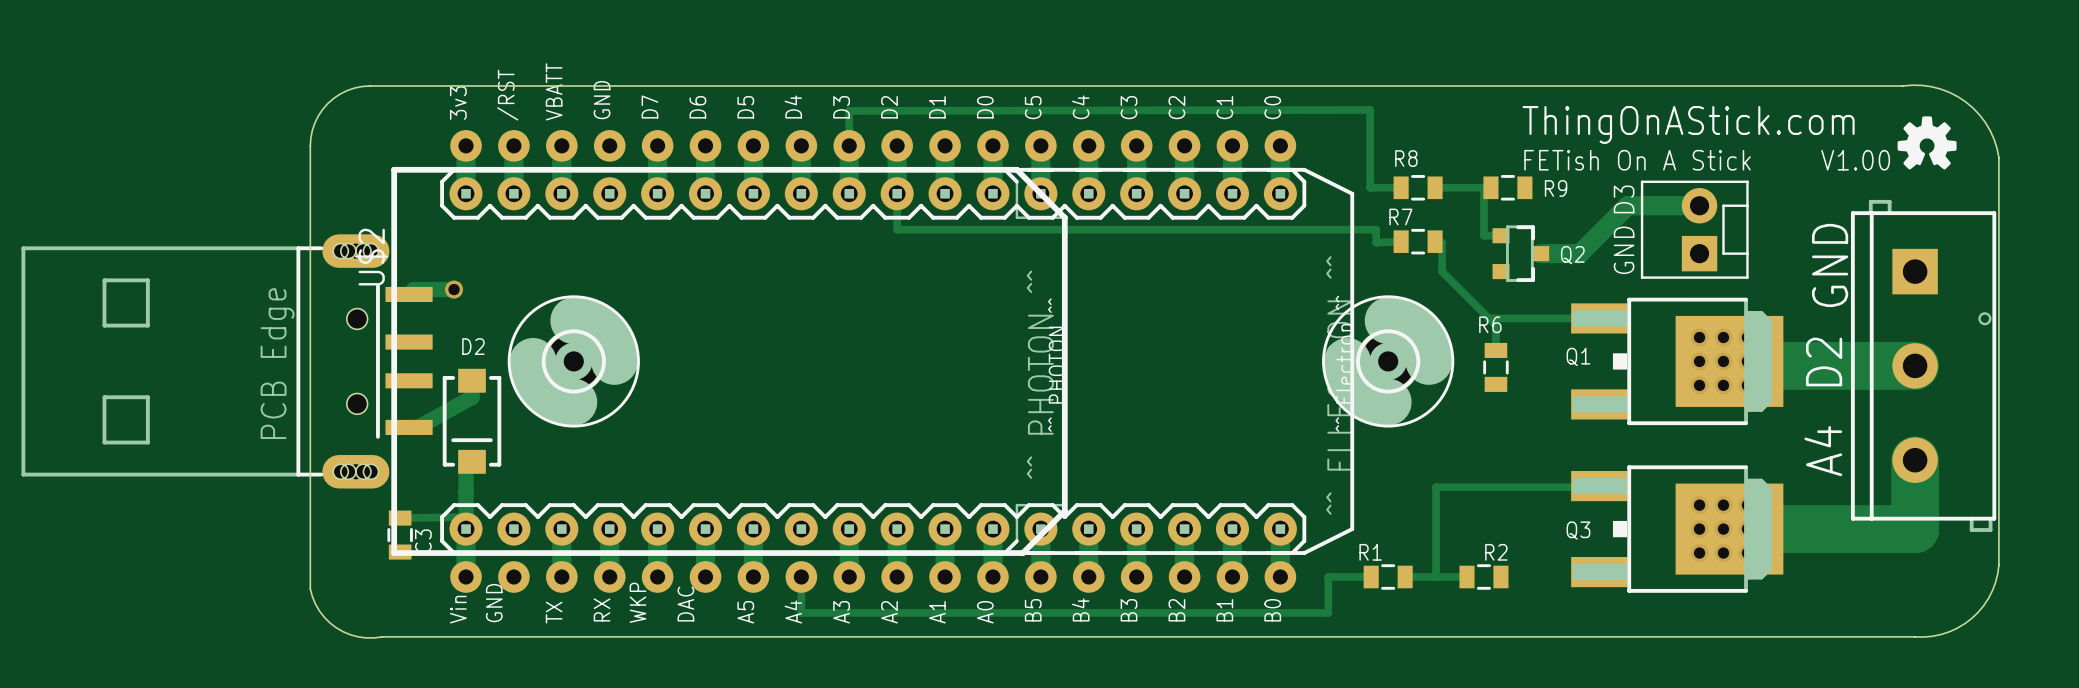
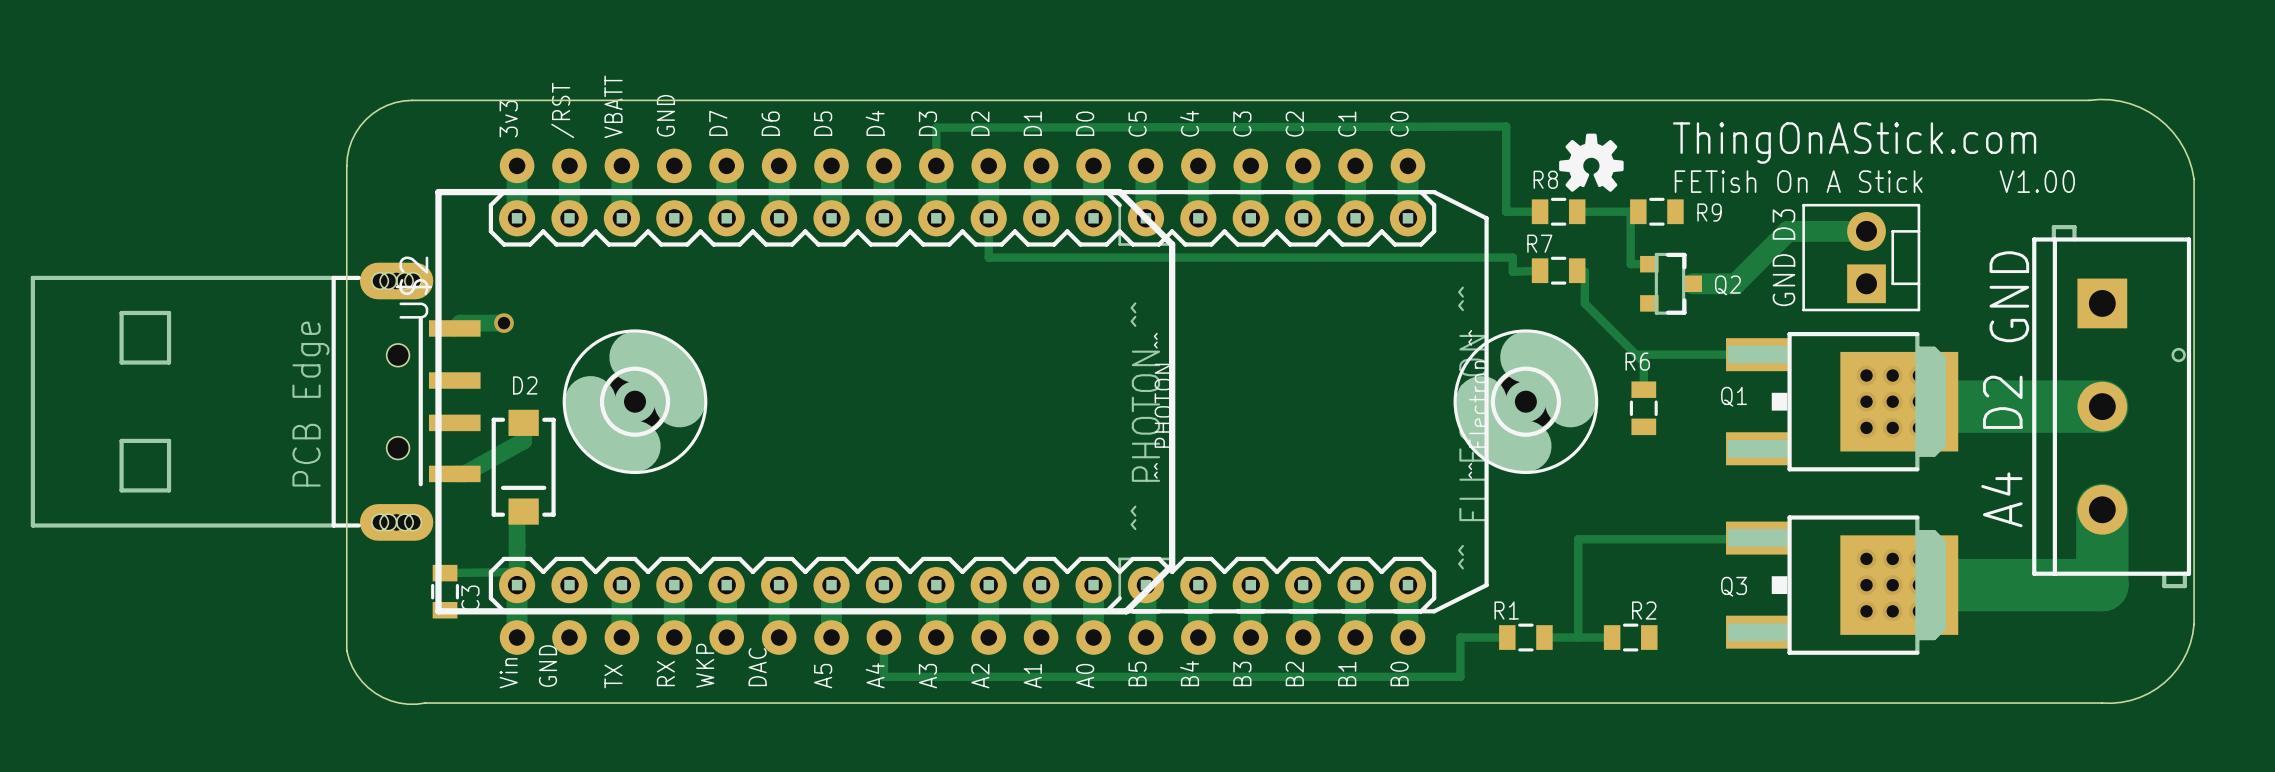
drawing: none -> [1559, 133, 1624, 192]
drawing: [1897, 116, 1957, 170] -> none

